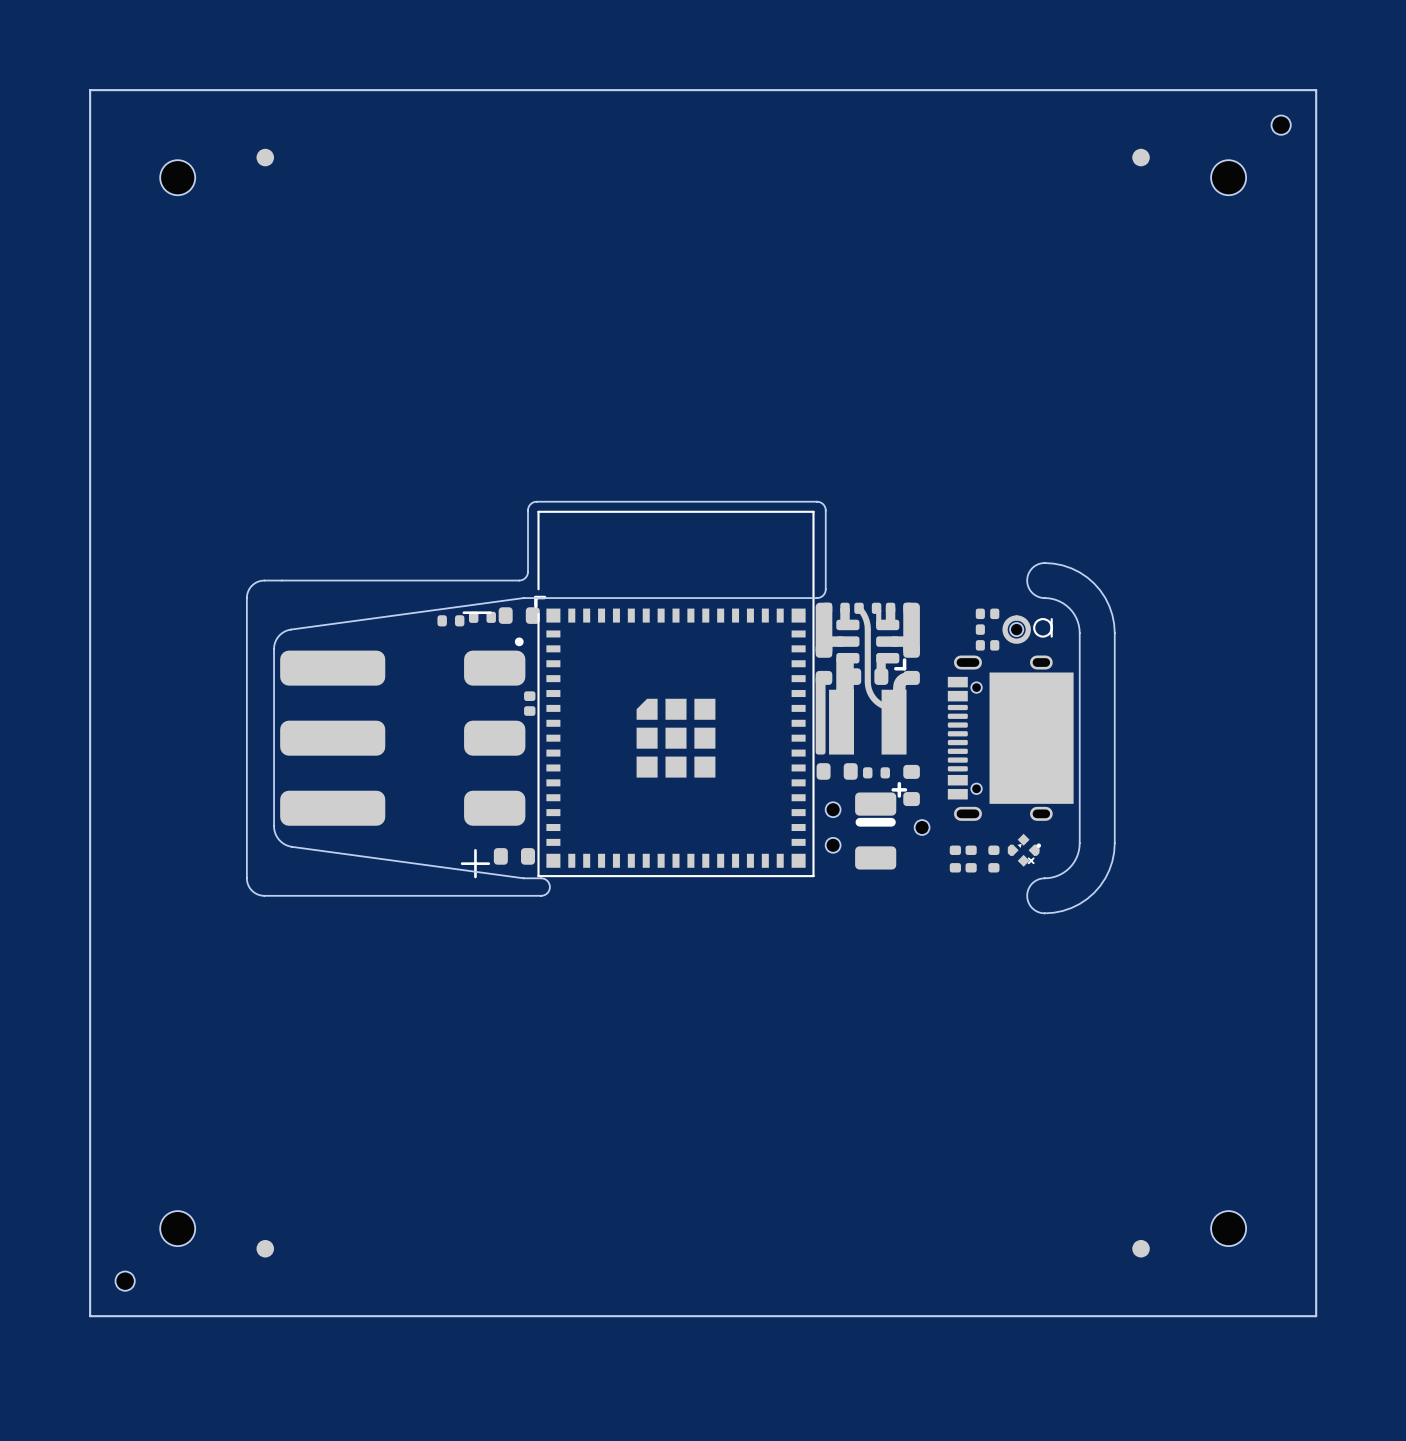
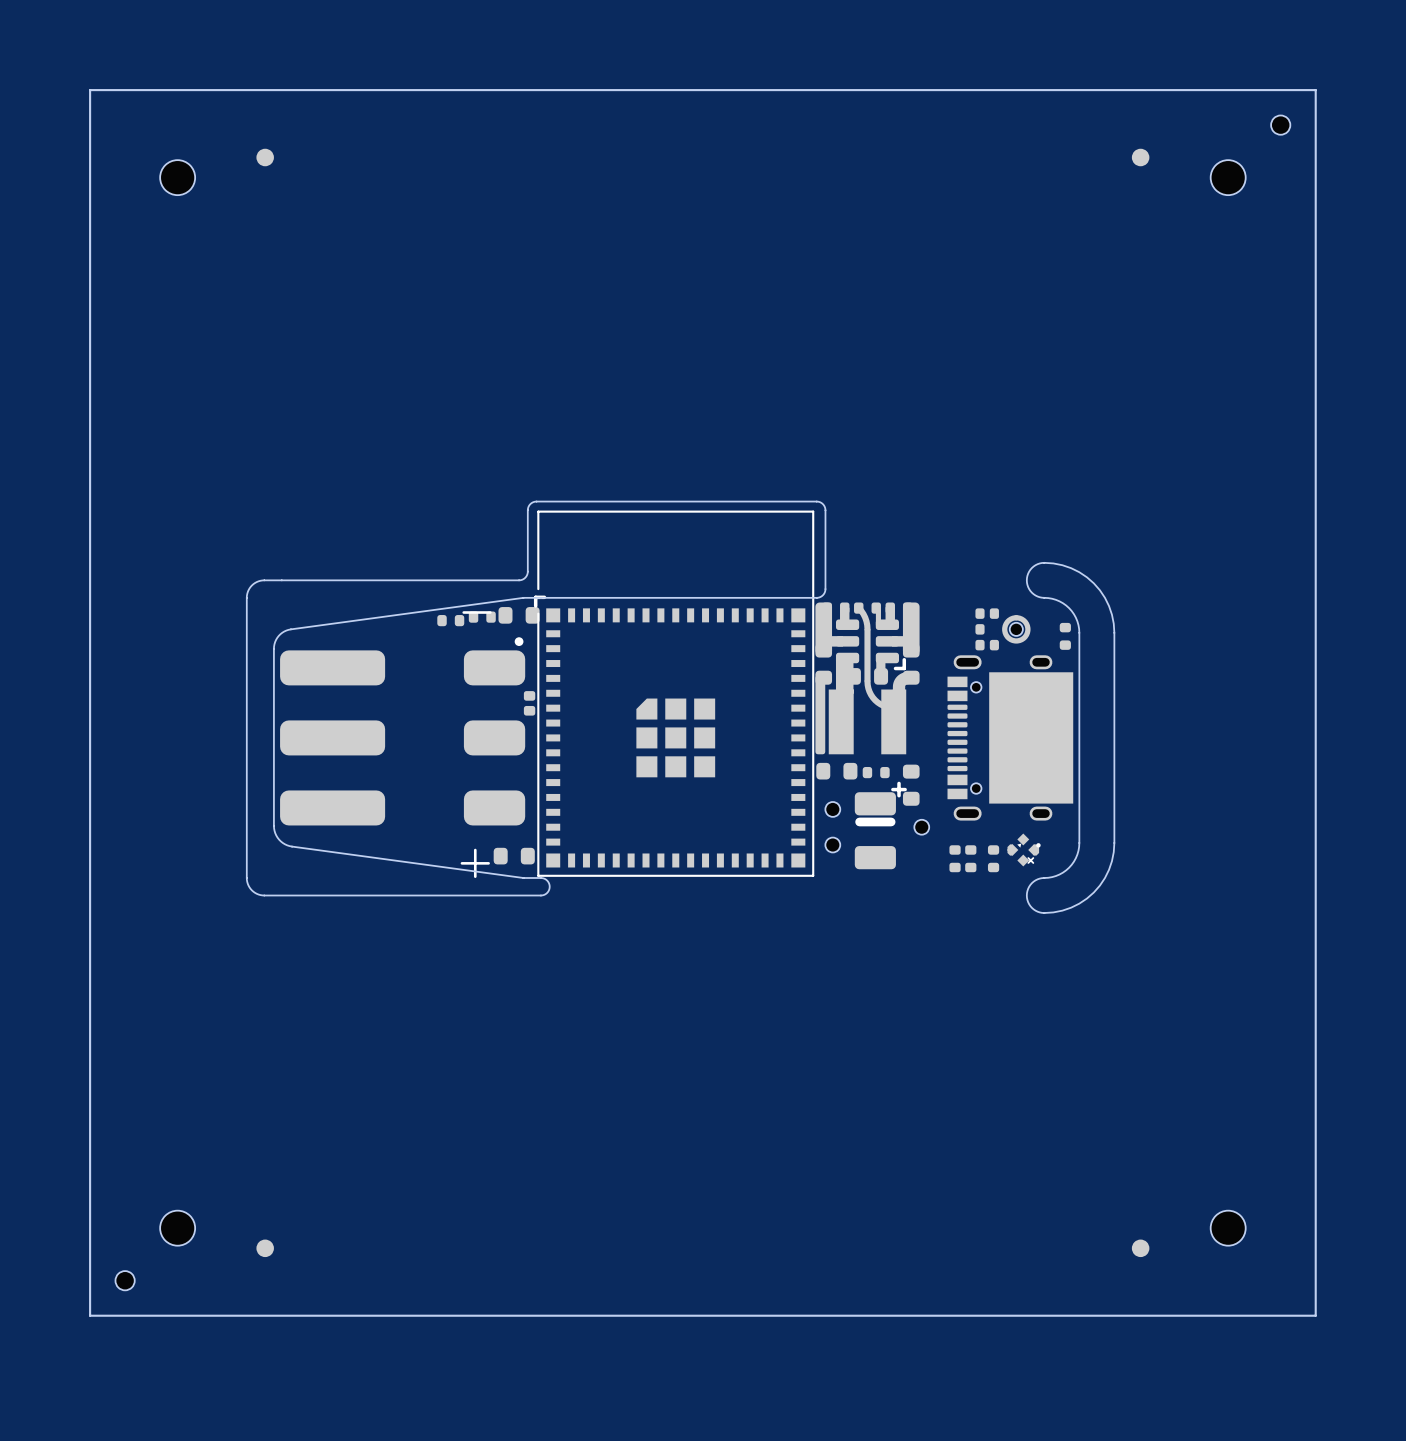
drawing: [1033, 618, 1053, 638] -> none
line: (1051, 619) (1051, 636) -> none
part: none -> (1065, 636)

